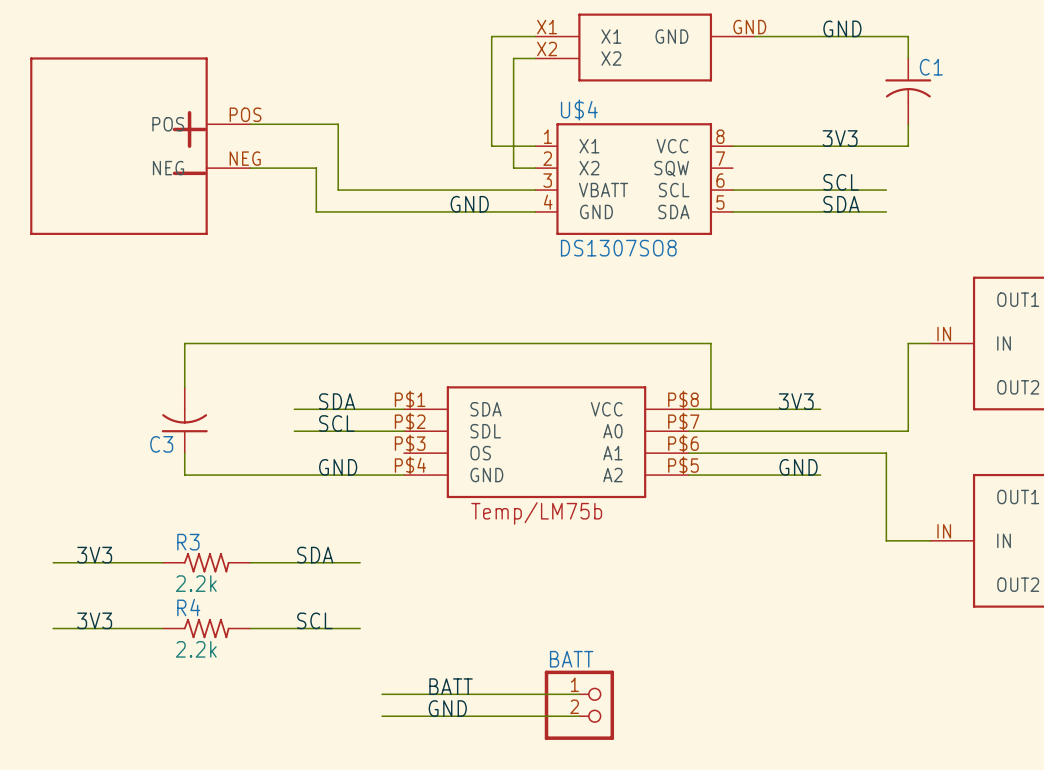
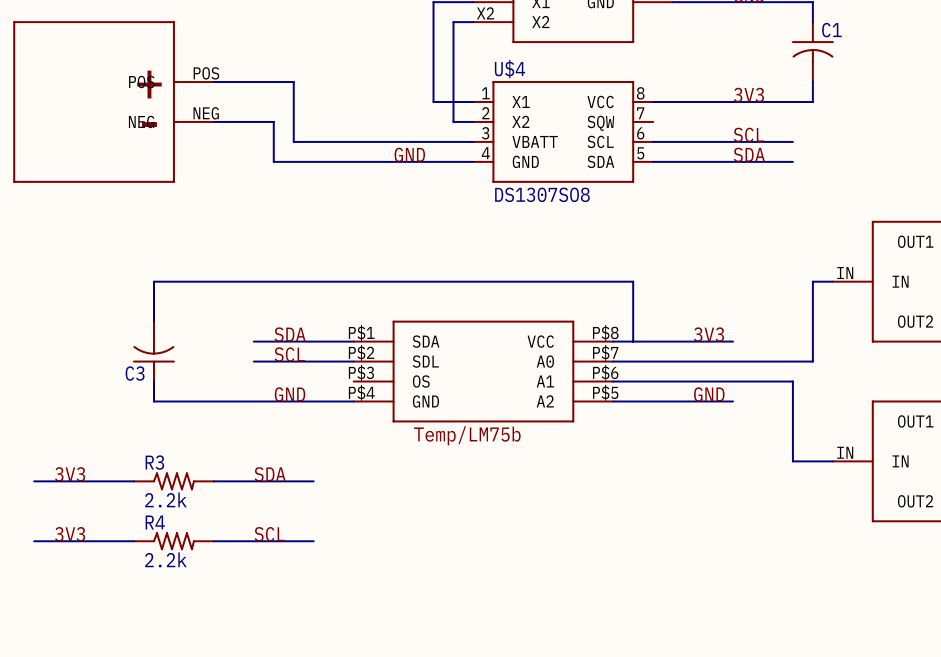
label: BATT (451, 686) -> none
wire: (382, 694) (579, 694) -> none
BATT: (579, 705) -> none
label: GND (447, 708) -> none
wire: (382, 716) (579, 716) -> none

